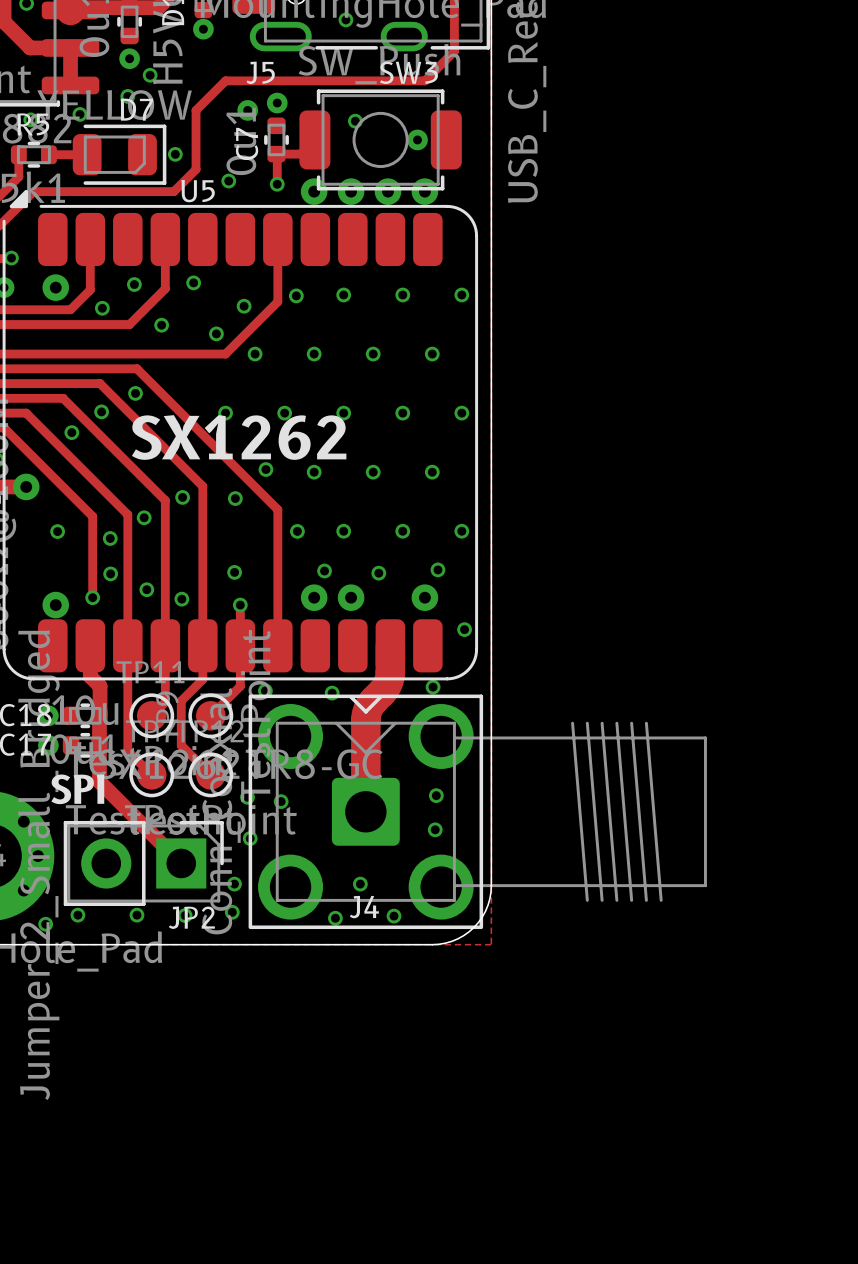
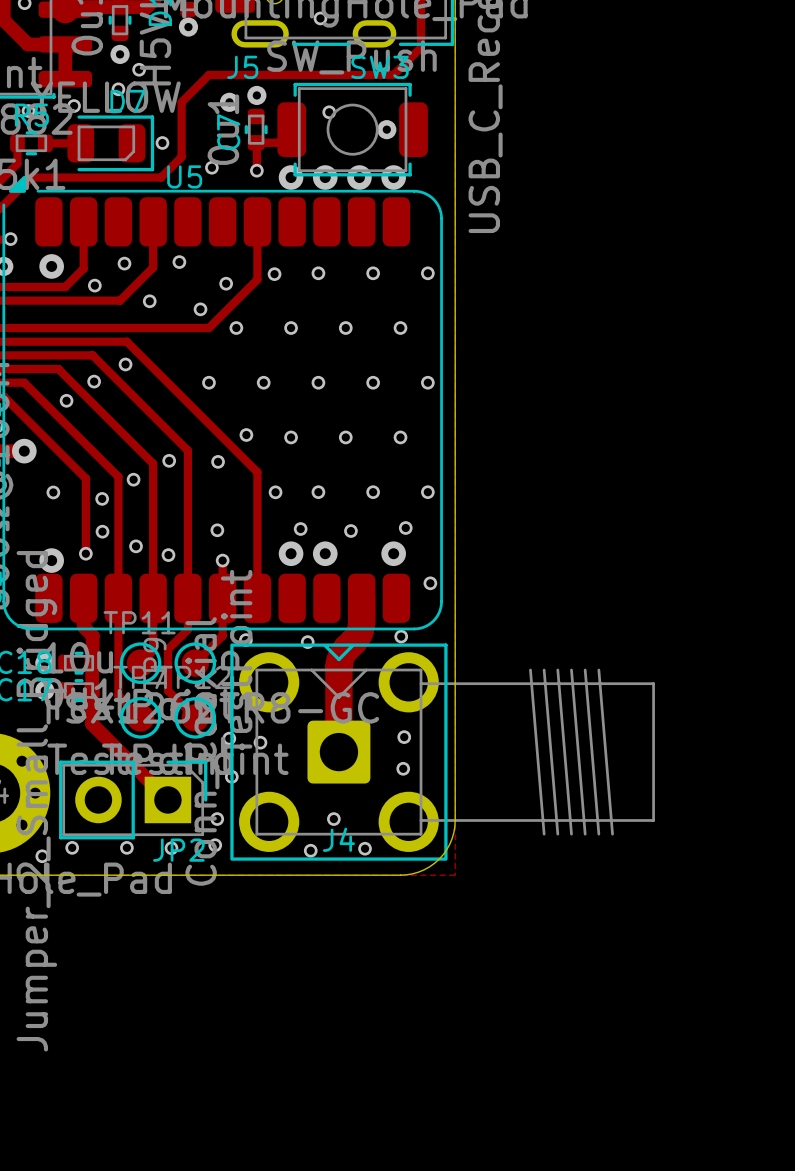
text: SX1262 (239, 437) -> none
text: SPI (77, 789) -> none

